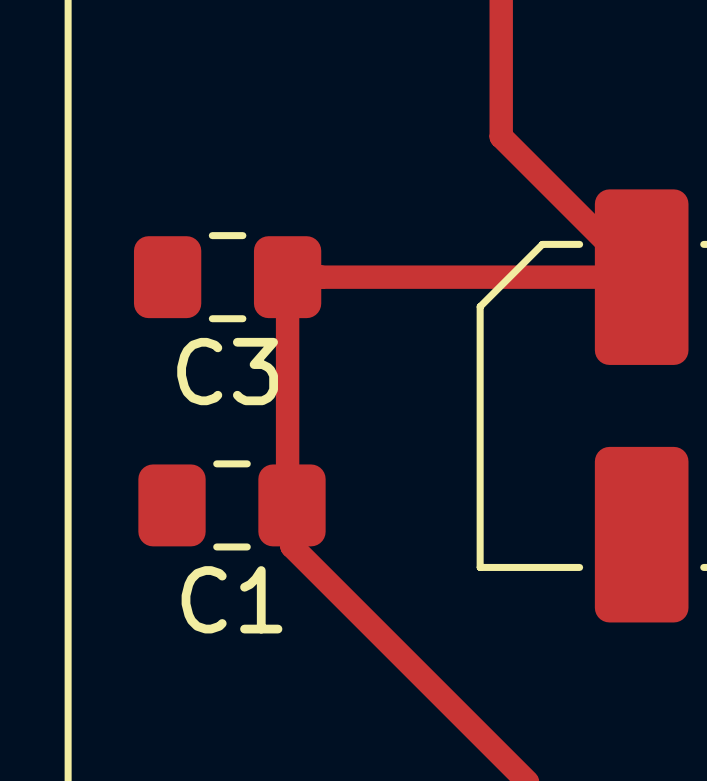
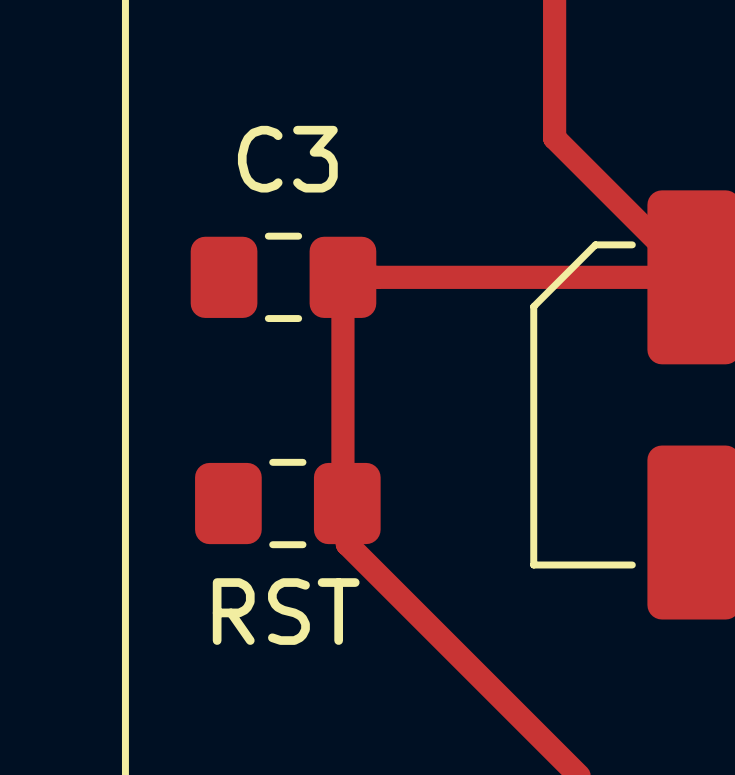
C3 name position: C3 (227, 371) -> C3 (287, 159)
C1 name: C1 (232, 599) -> RST (286, 611)

